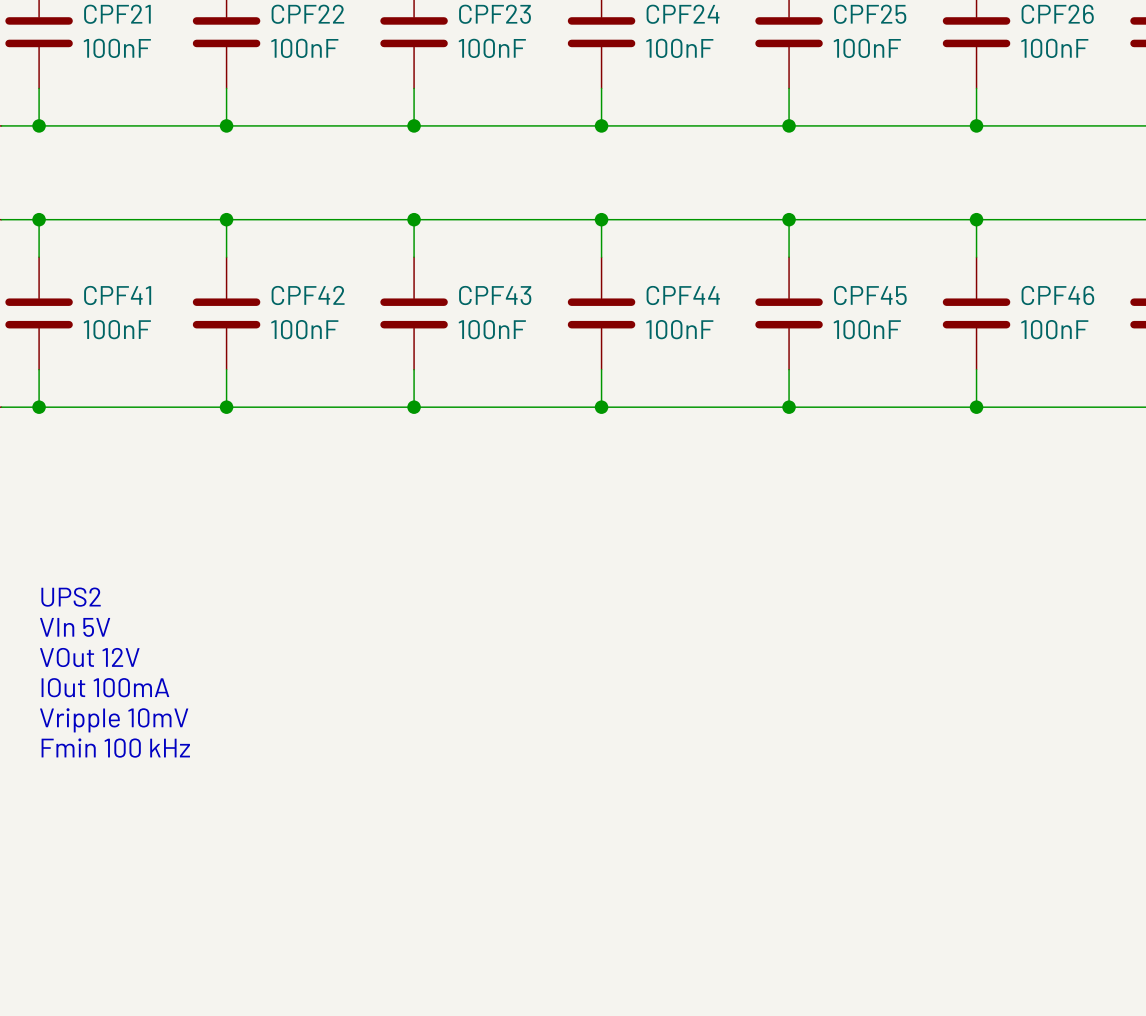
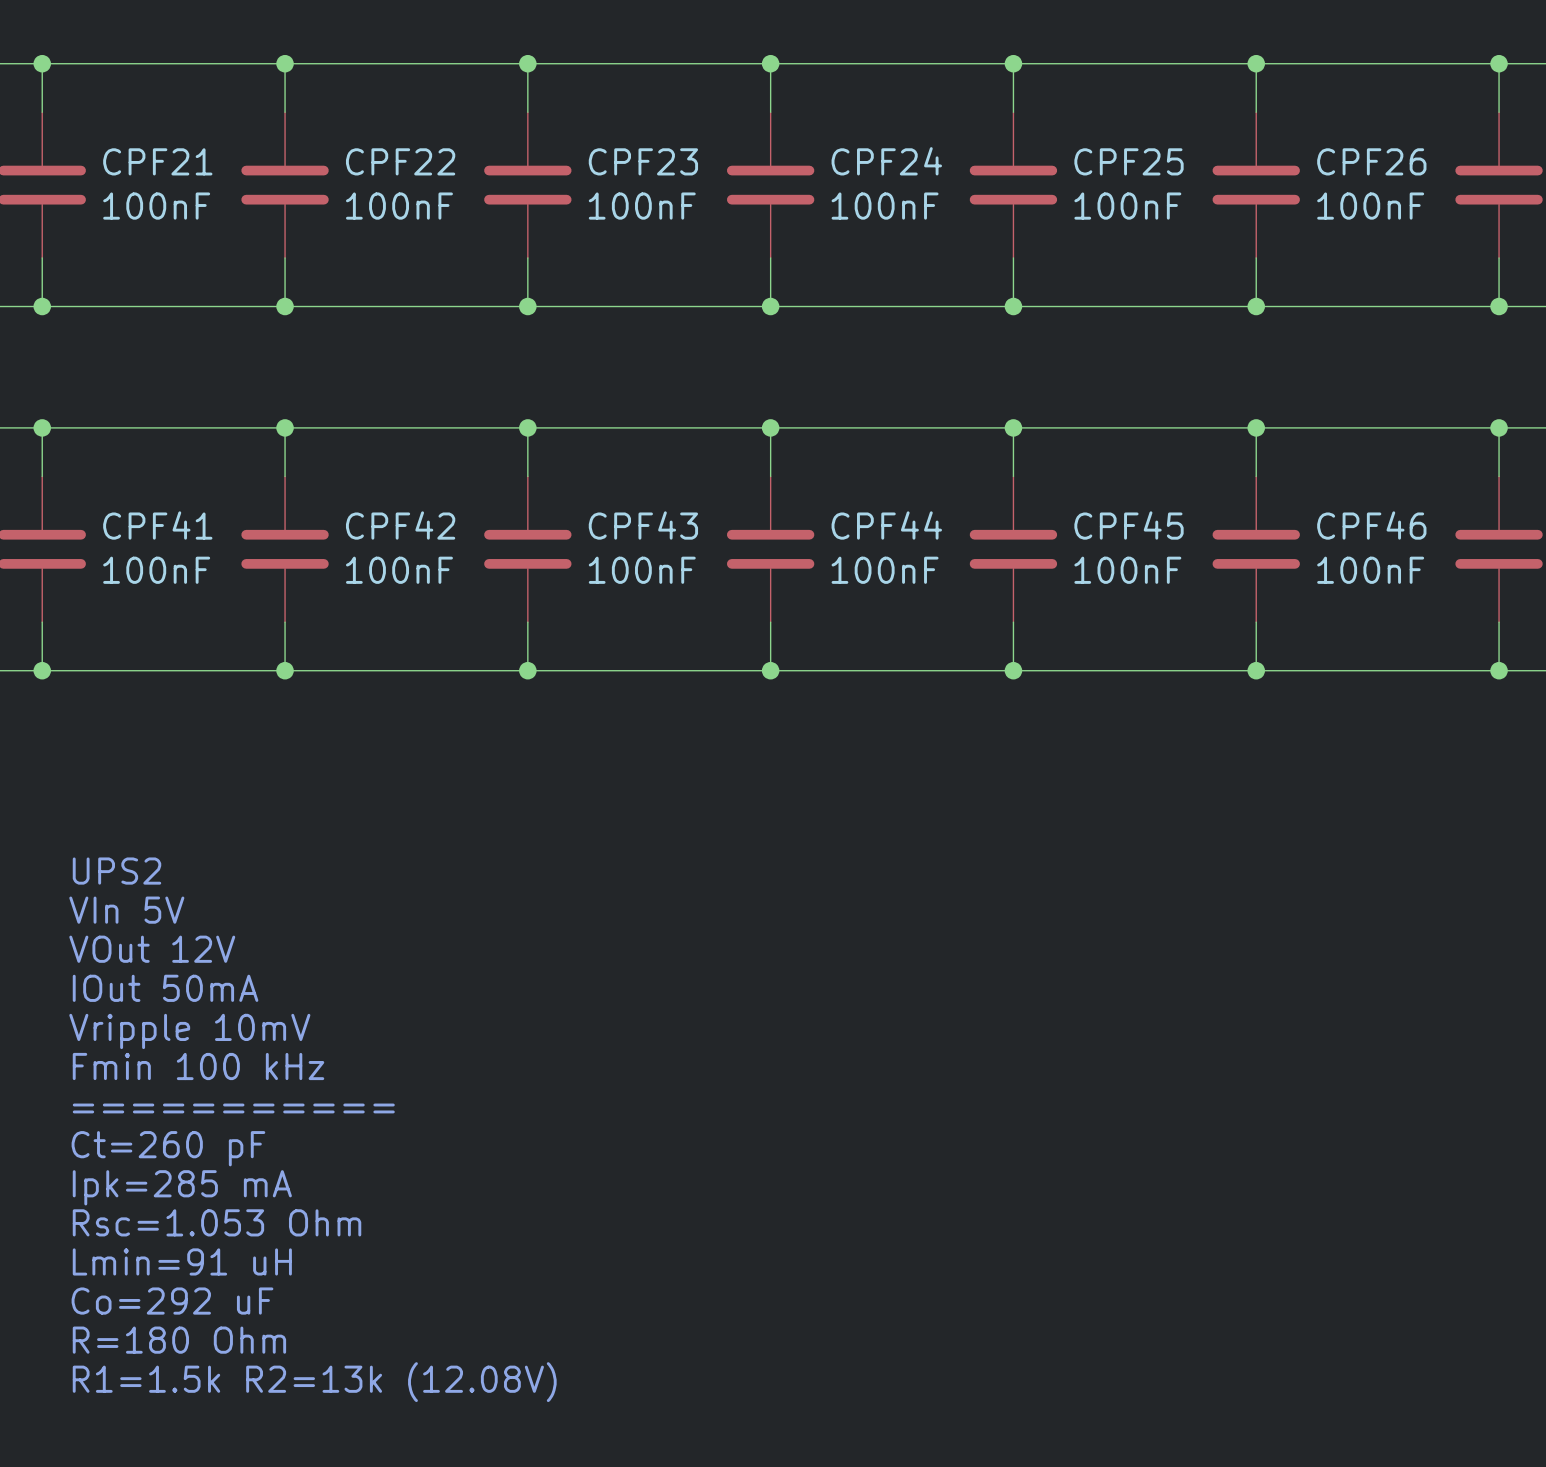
text position: UPS2 (71, 597) -> UPS2 (117, 871)
text position: VIn 5V (75, 627) -> VIn 5V (126, 910)
text position: VOut 12V (89, 657) -> VOut 12V (152, 949)
text: IOut 100mA (105, 687) -> IOut 50mA (165, 988)
text position: Vripple 10mV (114, 720) -> Vripple 10mV (189, 1031)
text: none -> =========== (233, 1108)
text position: Fmin 100 kHz (115, 748) -> Fmin 100 kHz (198, 1066)
text: none -> Ct=260 pF (168, 1148)
text: none -> Ipk=285 mA (182, 1187)
text: none -> Rsc=1.053 Ohm (217, 1222)
text: none -> Lmin=91 uH (182, 1261)
text: none -> Co=292 uF (172, 1301)
text: none -> R=180 Ohm (179, 1340)
text: none -> R1=1.5k R2=13k (12.08V) (314, 1382)

